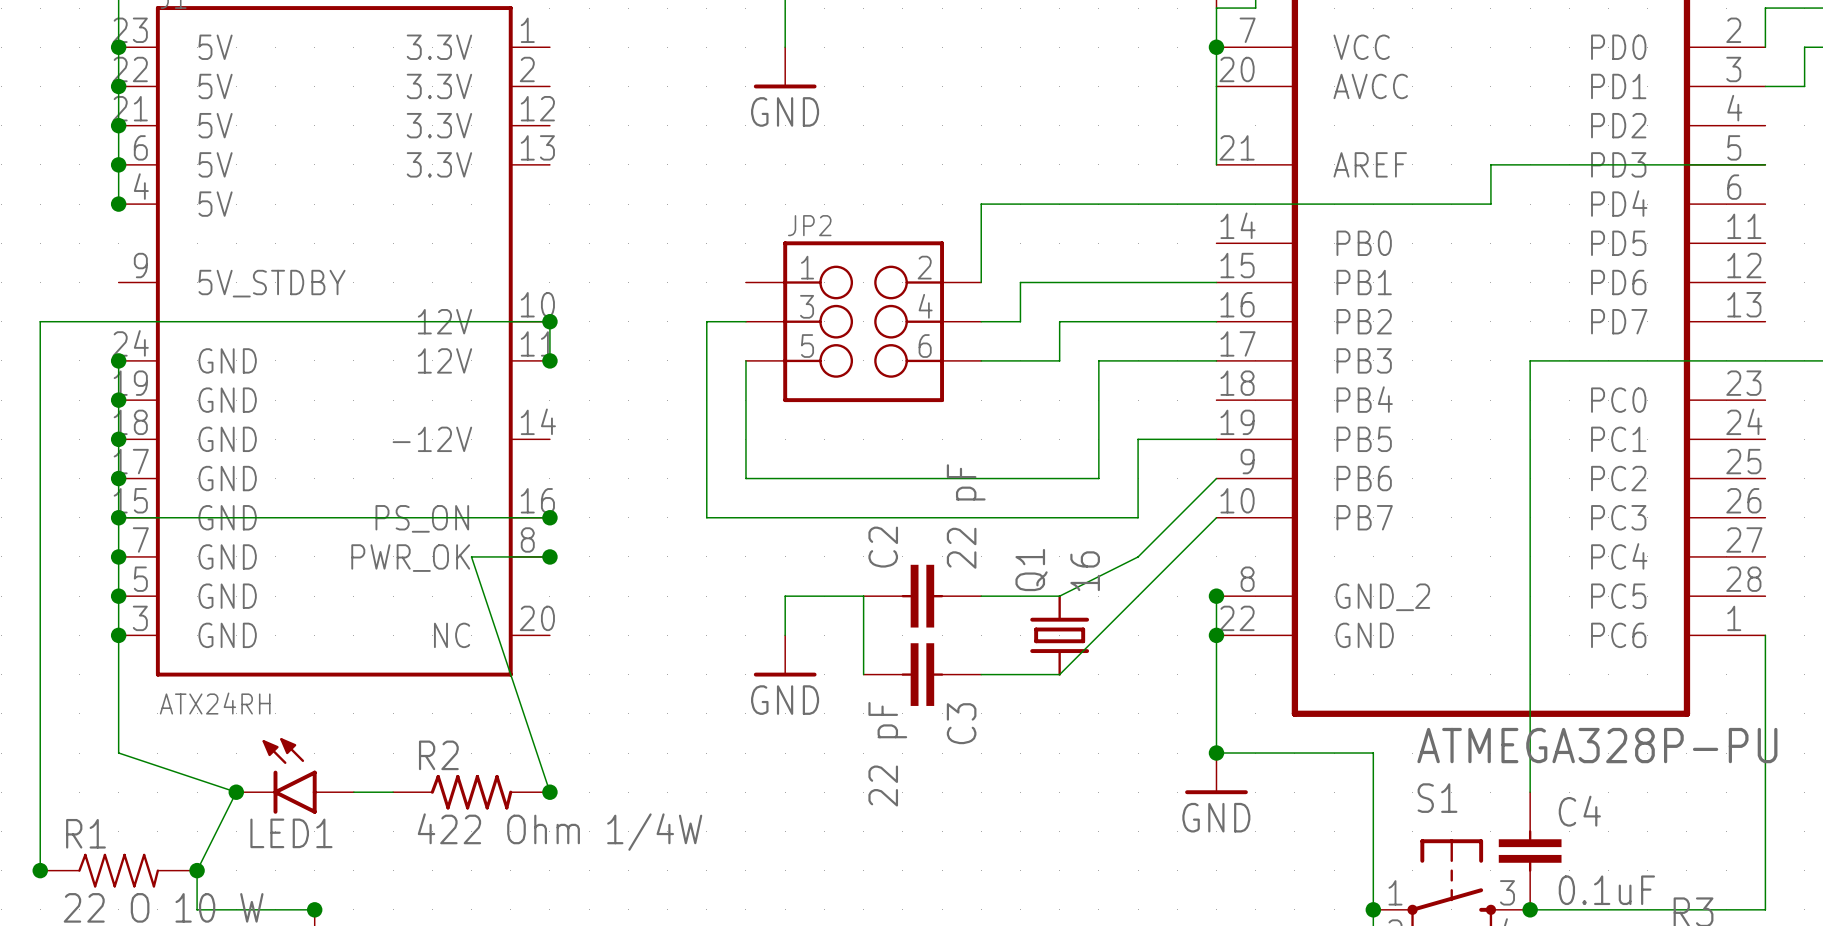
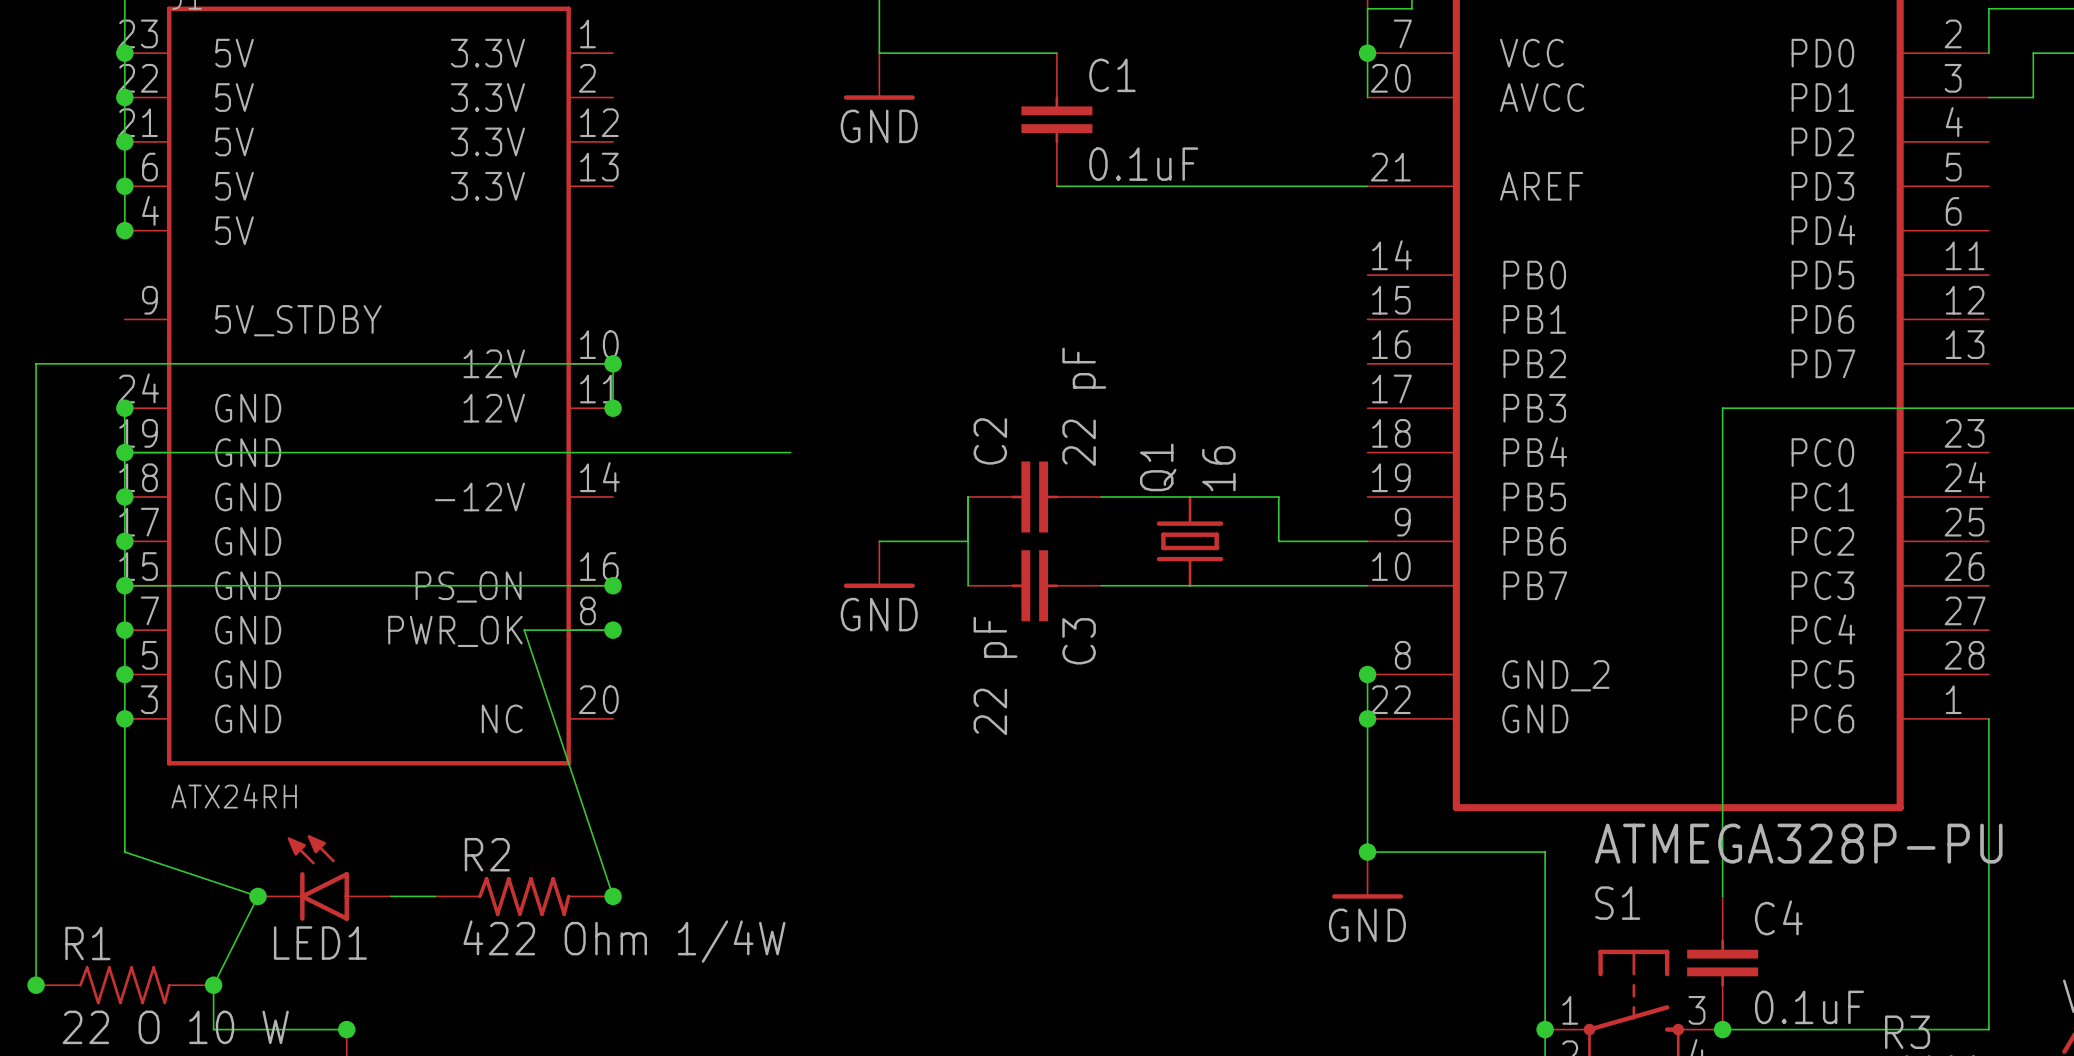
wire: none -> (879, 53) (1056, 53)
wire: (1216, 86) (1216, 164) -> (1056, 186) (1367, 186)
C1: none -> 0.1uF (1056, 119)
wire: (1765, 164) (1490, 164) (1490, 204) (981, 204) (981, 282) -> none
wire: (1216, 282) (1020, 282) (1020, 321) (981, 321) -> none
wire: (745, 321) (706, 321) (706, 517) (981, 517) -> none
JP2: (863, 321) -> none
wire: (1216, 321) (1059, 321) (1059, 360) (981, 360) -> none
wire: (745, 360) (745, 478) (785, 478) -> none
wire: (1216, 360) (1098, 360) (1098, 478) (863, 478) -> none
wire: none -> (124, 452) (790, 452)
wire: none -> (968, 496) (968, 585)
wire: (1138, 439) (1216, 439) -> (1278, 496) (1101, 496)
wire: (1138, 478) (1138, 517) -> (1278, 541) (1367, 541)
wire: (1216, 478) (1138, 556) (1059, 596) (981, 596) -> none
wire: (1216, 517) (1059, 674) (981, 674) -> (1367, 585) (1278, 585)
C2 position: (922, 596) -> (1034, 496)
wire: (785, 635) (785, 596) (863, 596) (863, 674) -> none
Q1 position: (1059, 635) -> (1190, 541)
power symbol position: GND (785, 655) -> GND (879, 564)
C3 position: (922, 674) -> (1034, 585)

